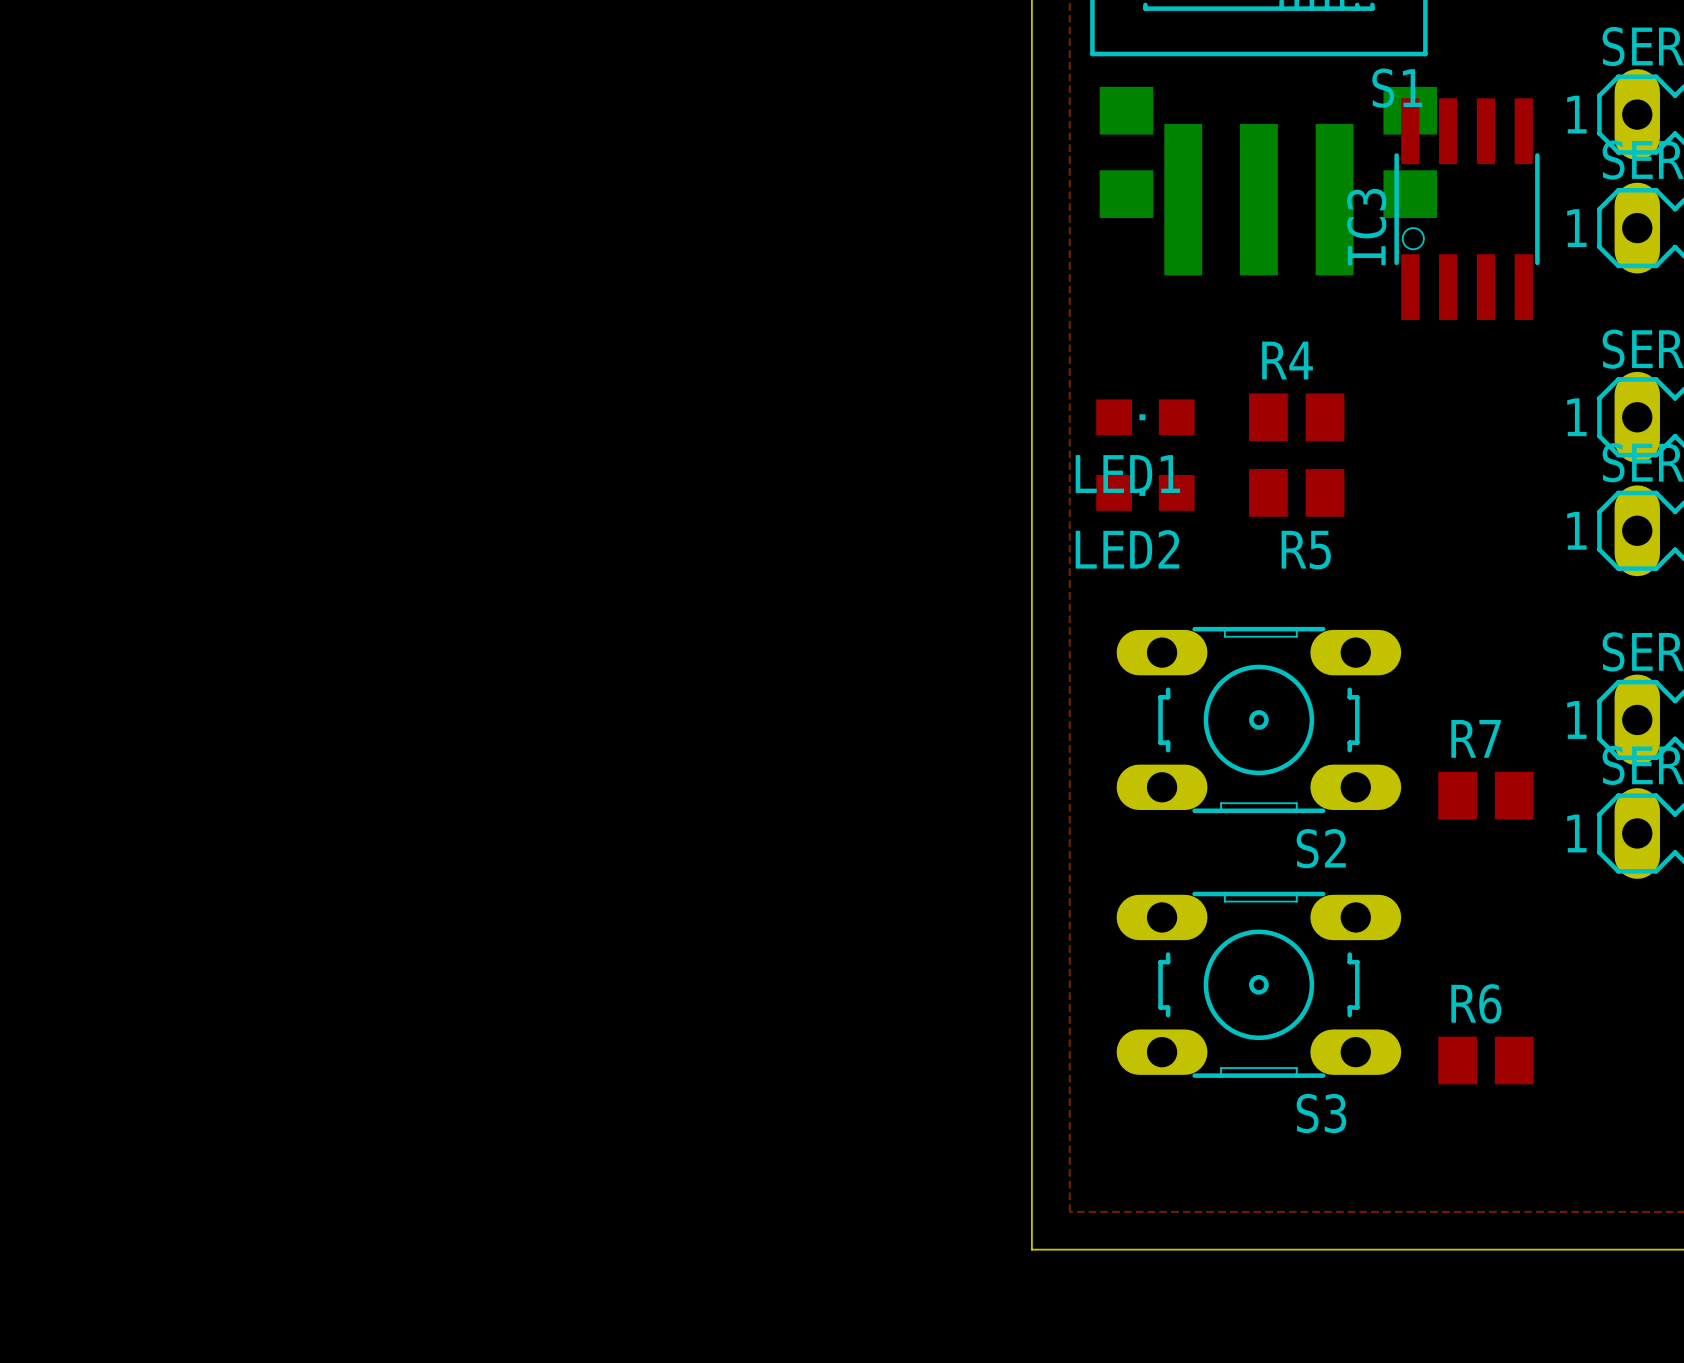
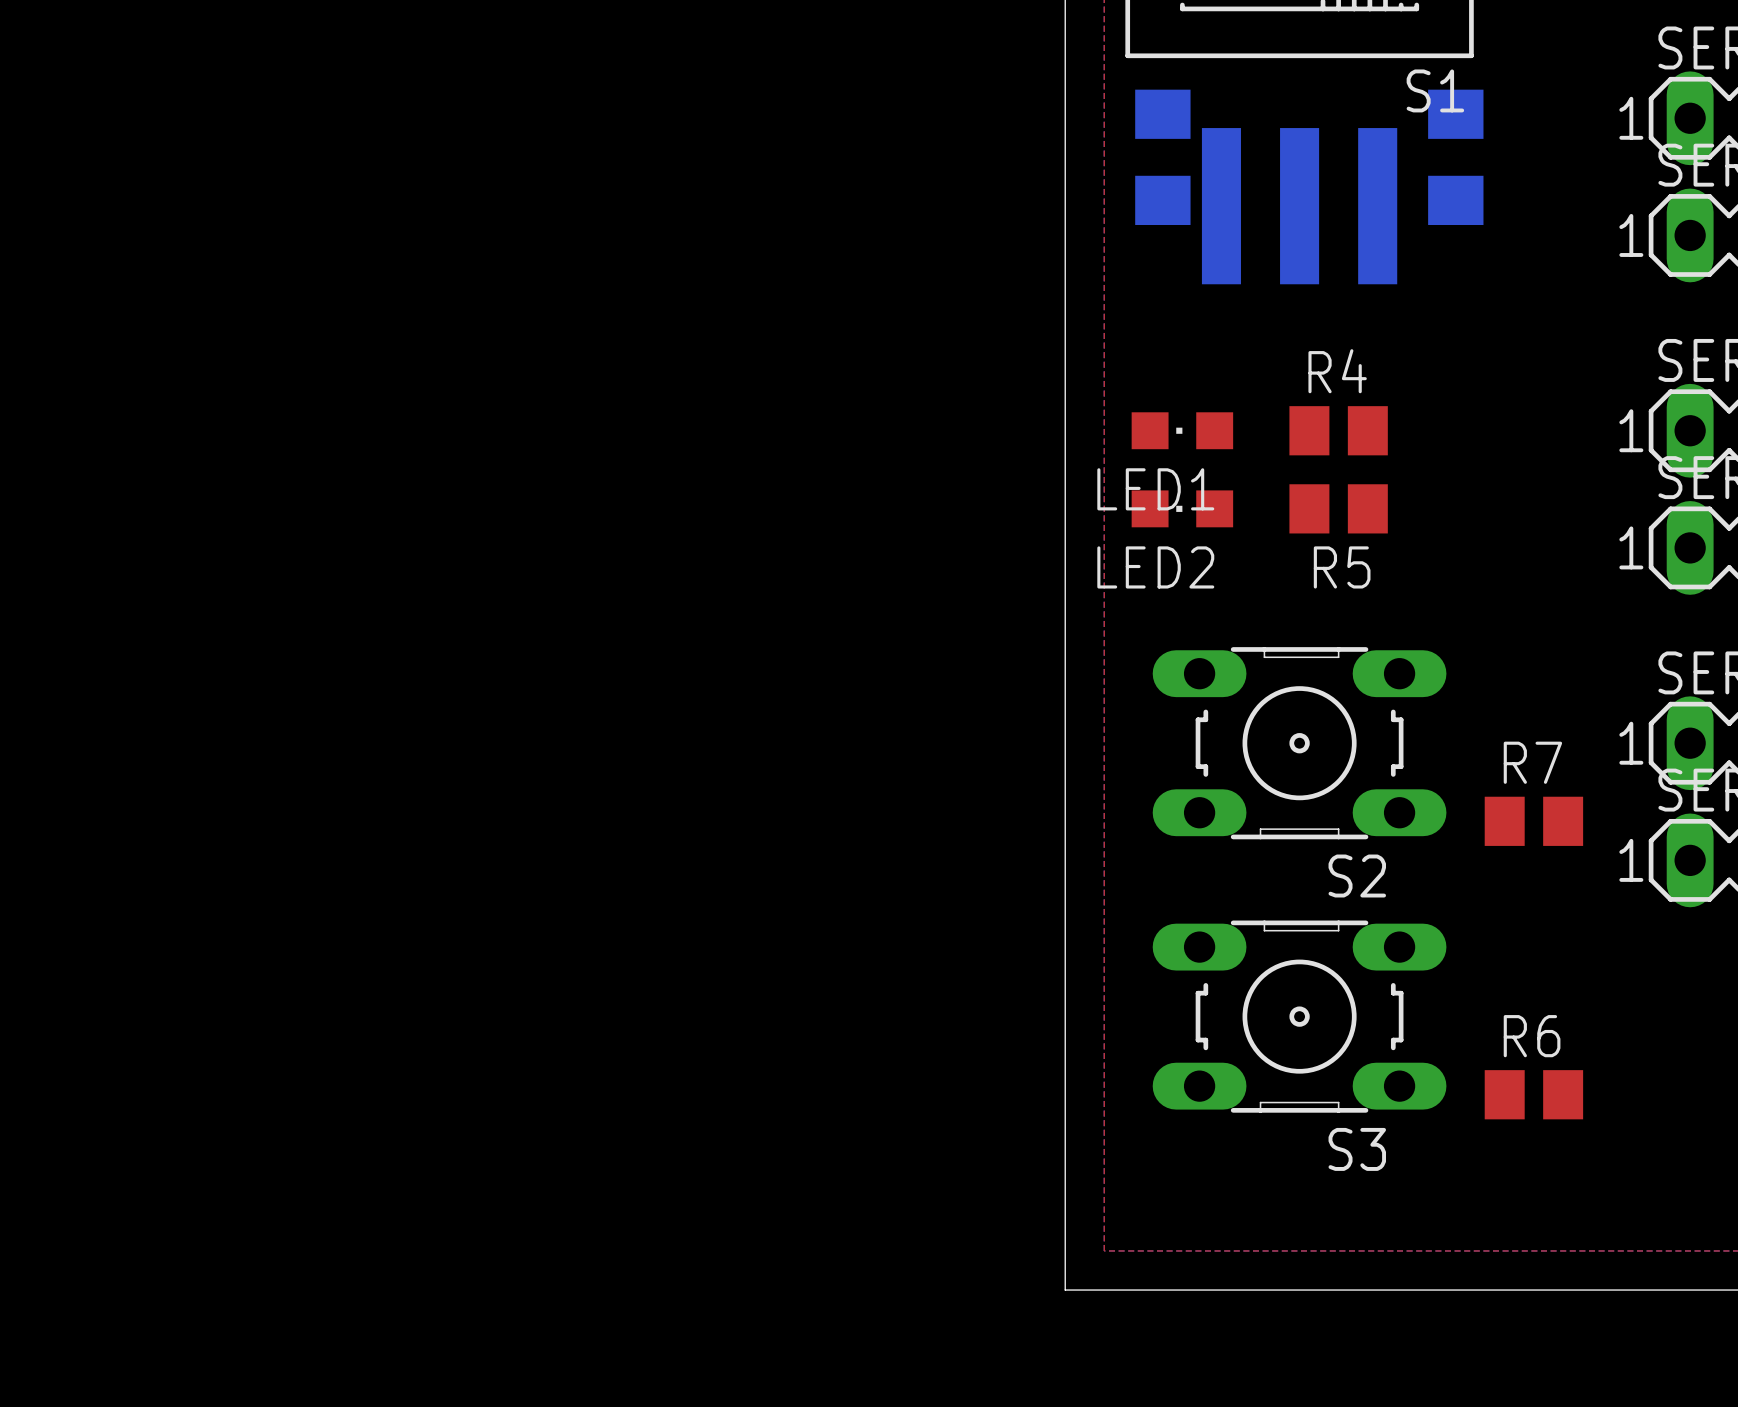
IC3: (1467, 209) -> none

